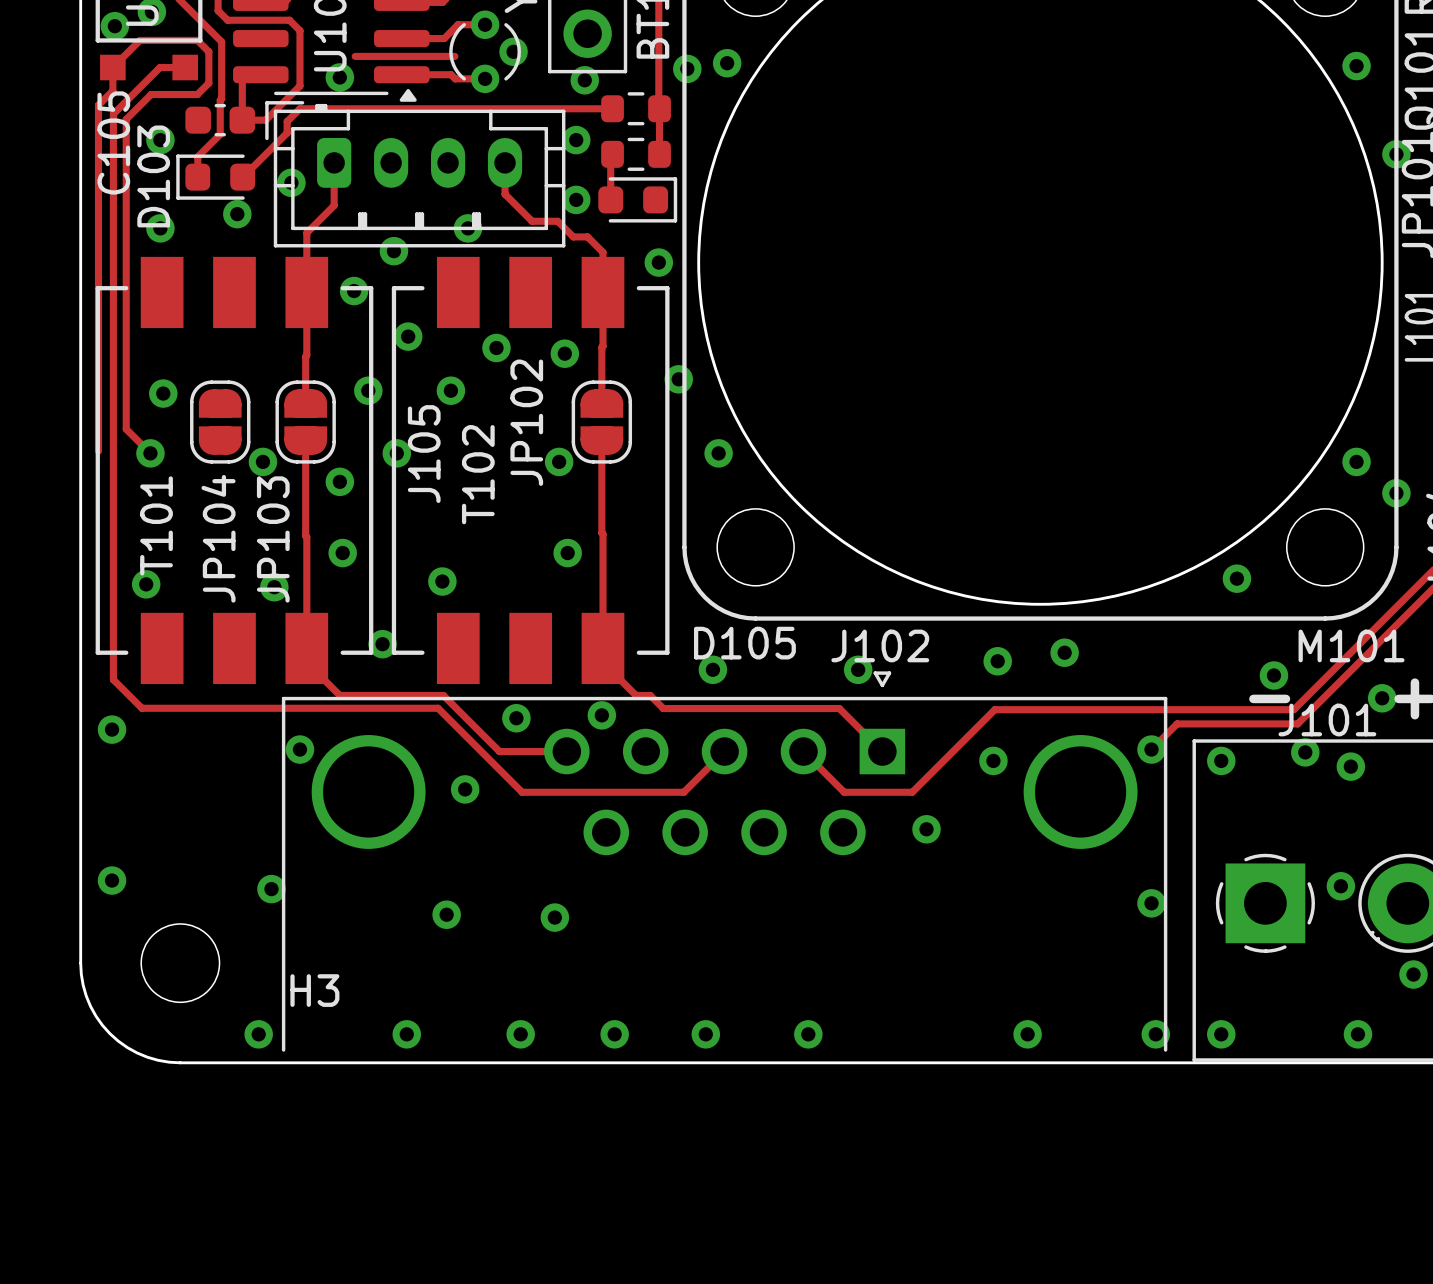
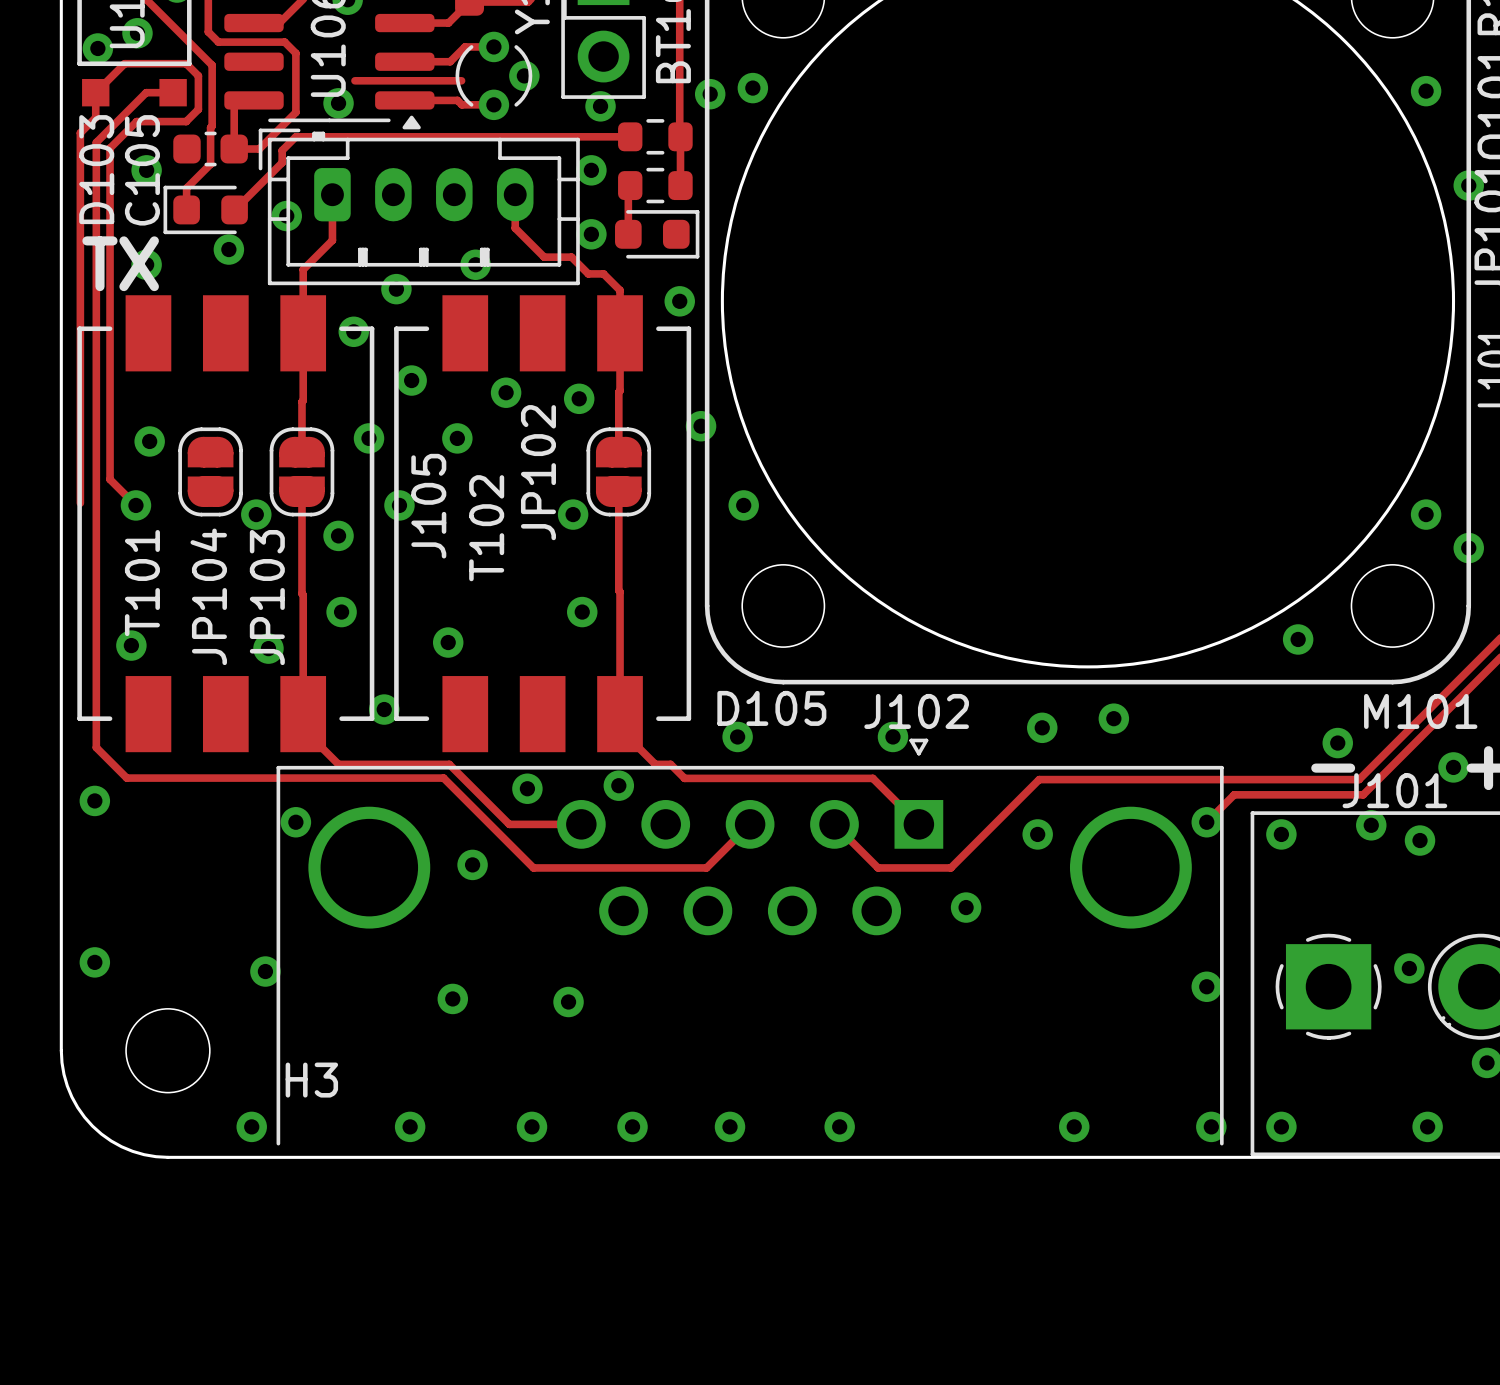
C105 name position: C105 (113, 142) -> C105 (142, 170)
D103 name position: D103 (153, 176) -> D103 (96, 169)
text: none -> TX (120, 263)

